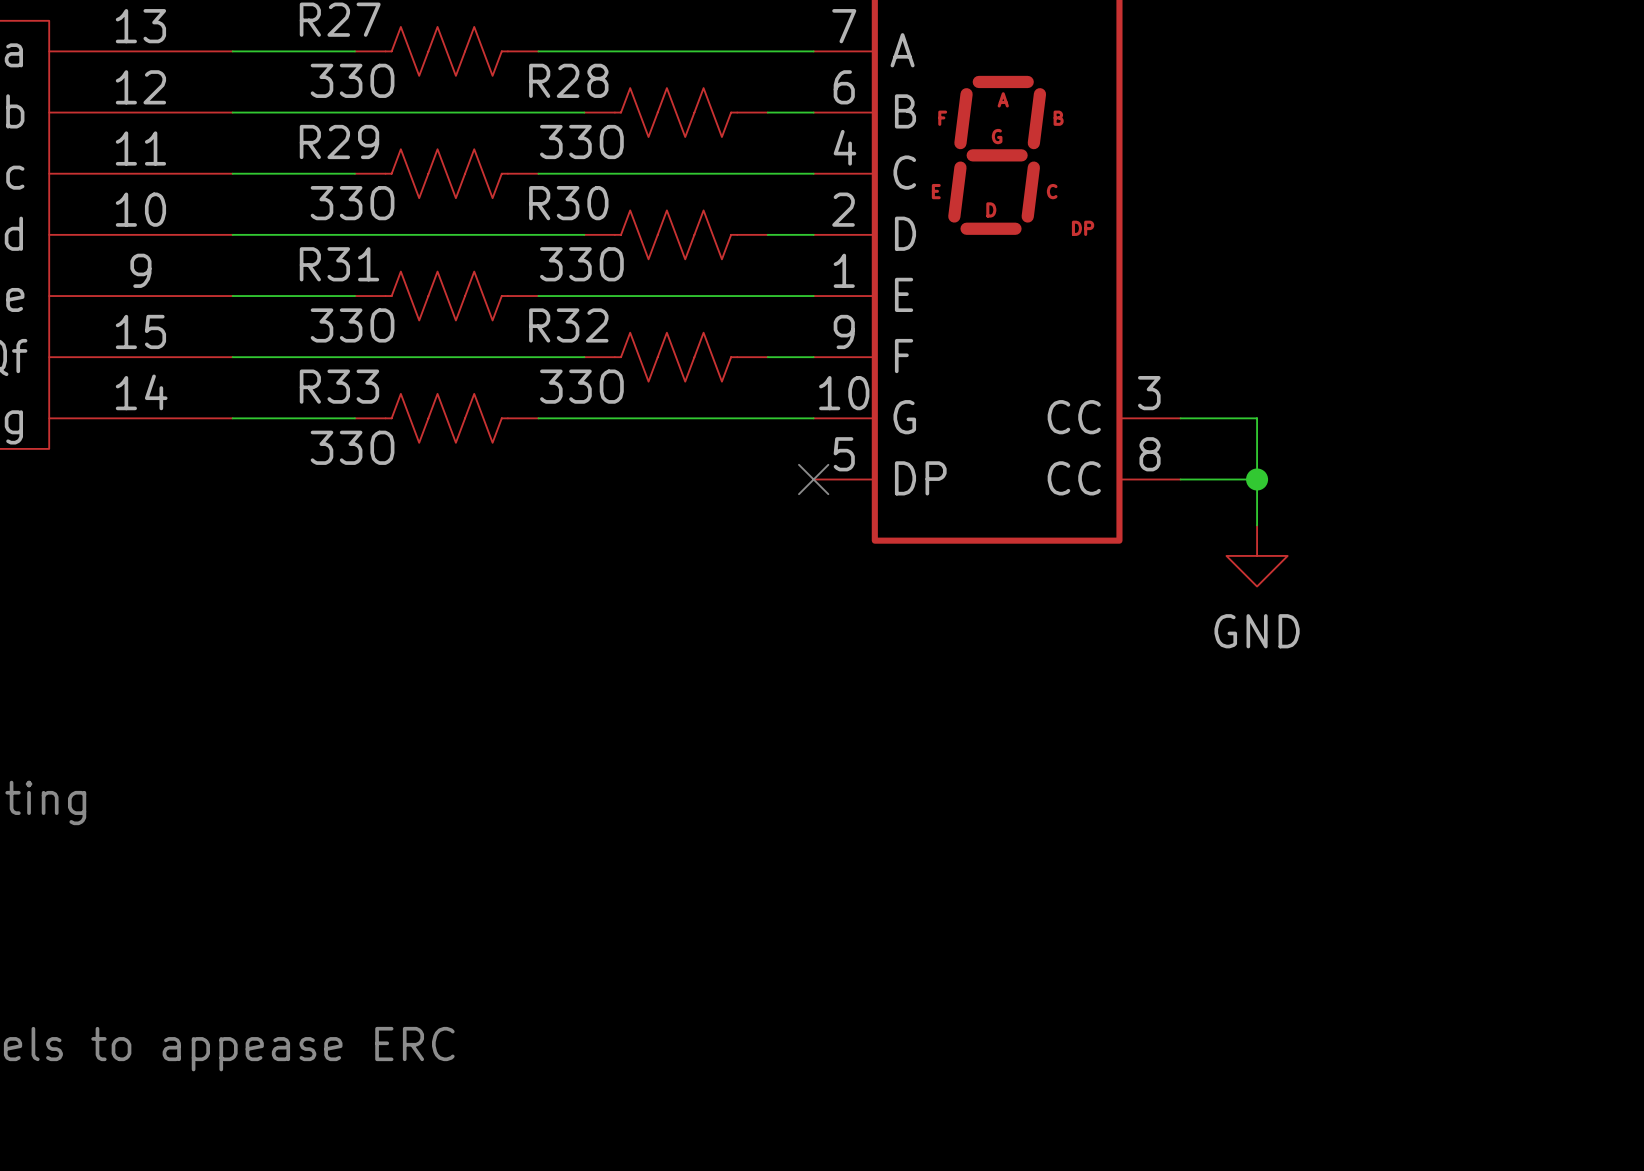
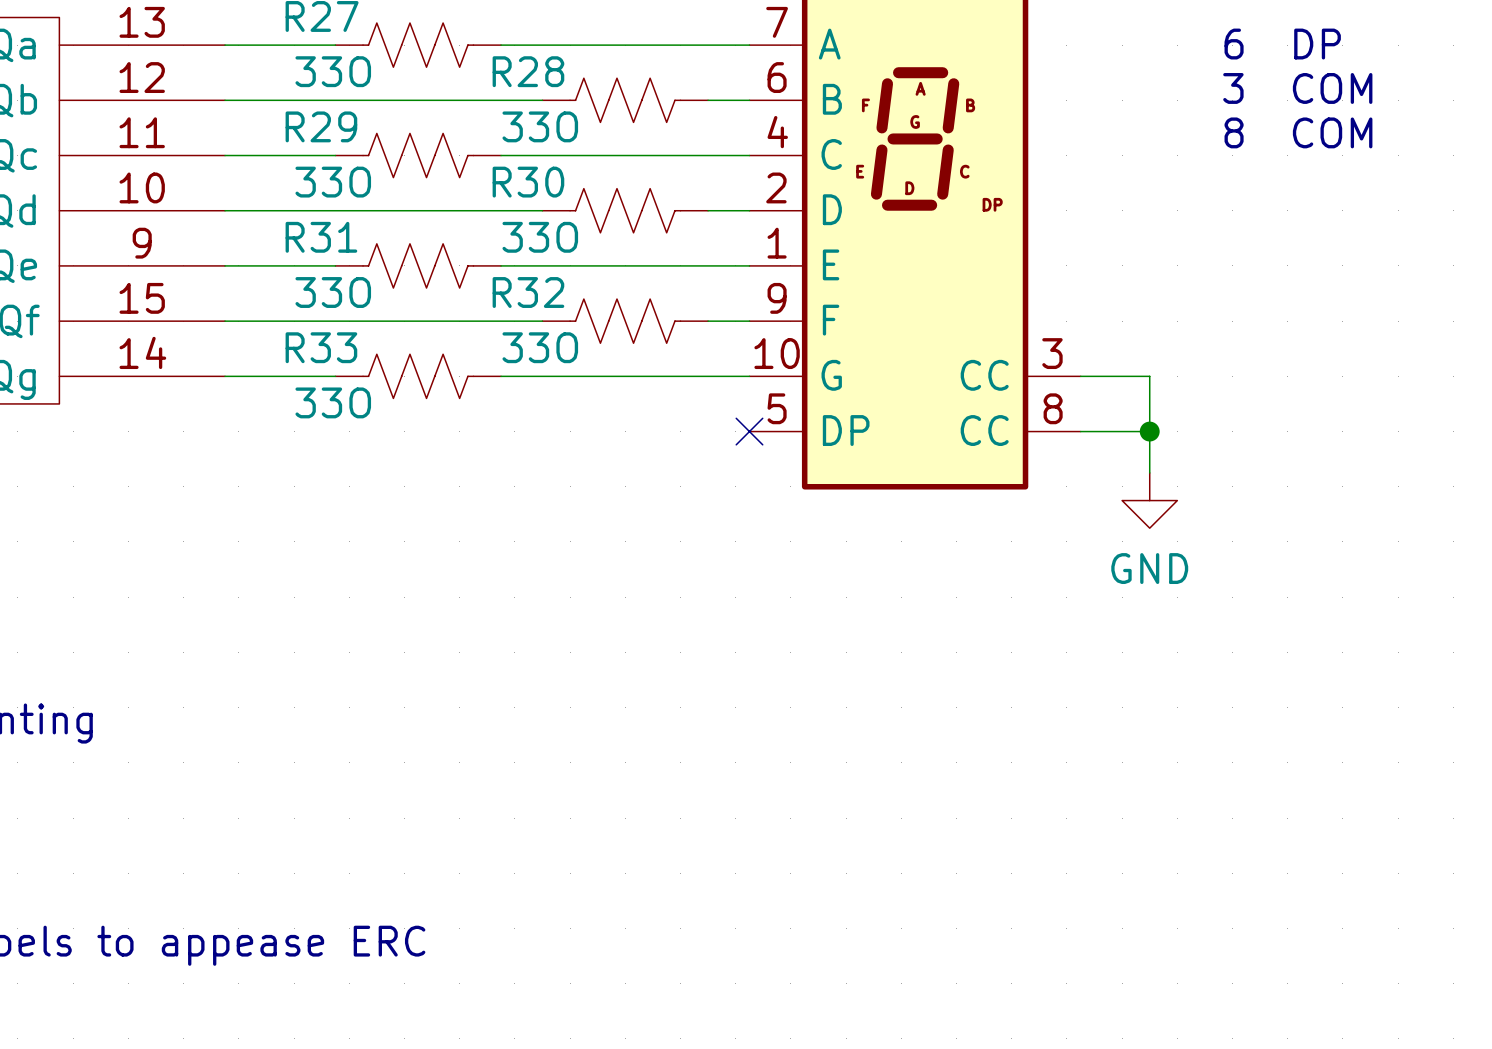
text: none -> 6 DP (1282, 44)
text: none -> 3 COM (1297, 88)
text: none -> 8 COM (1298, 132)

